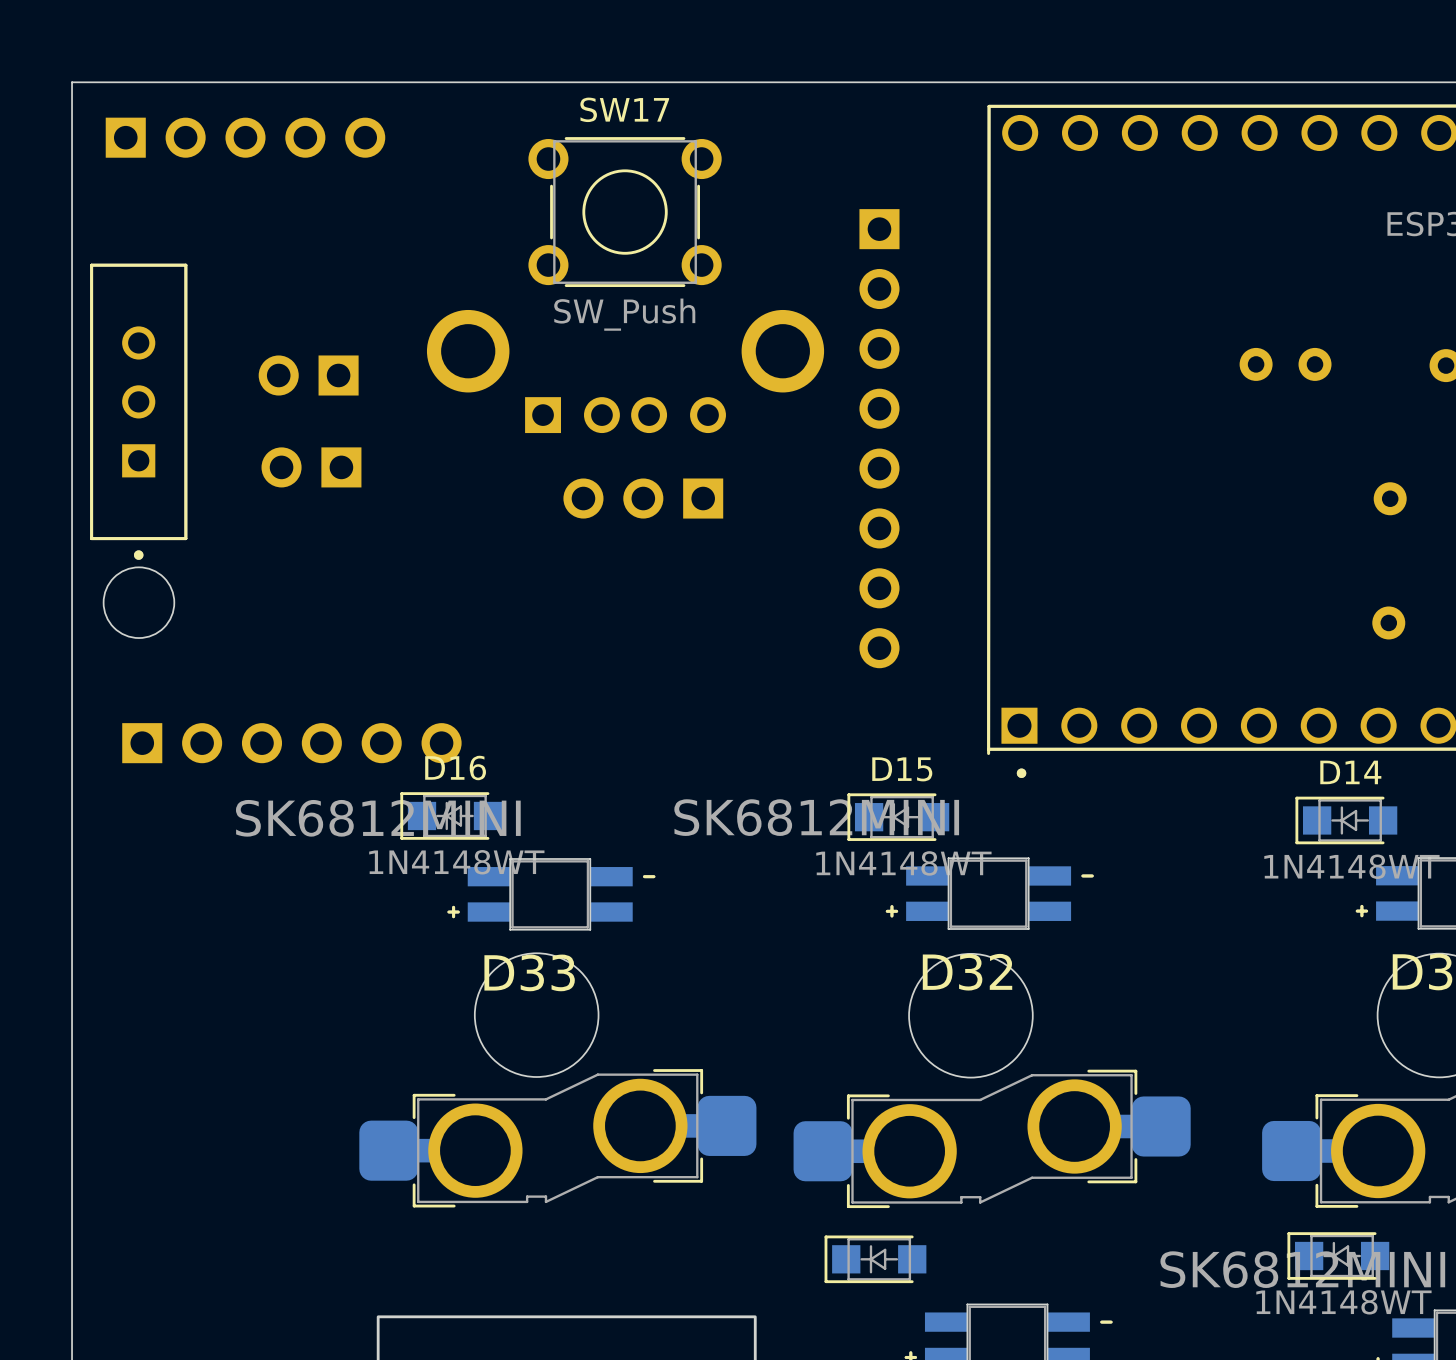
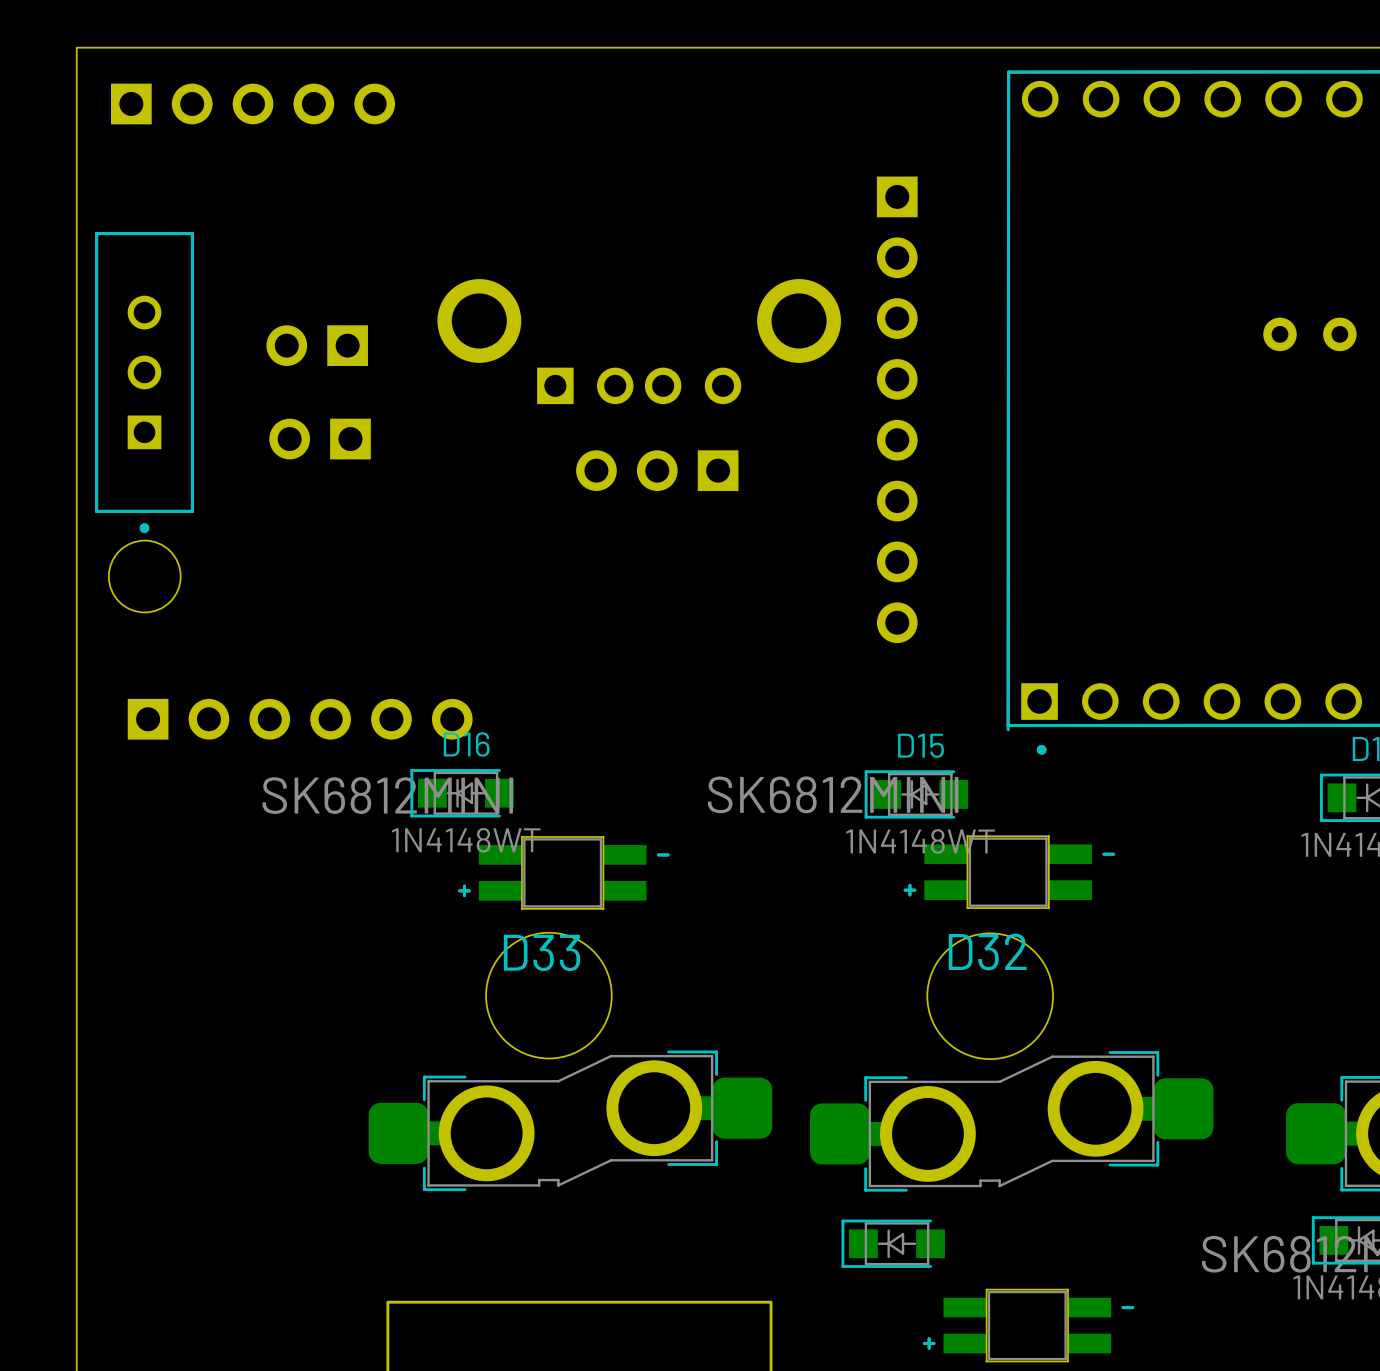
SW17: SW_Push (625, 212) -> none

